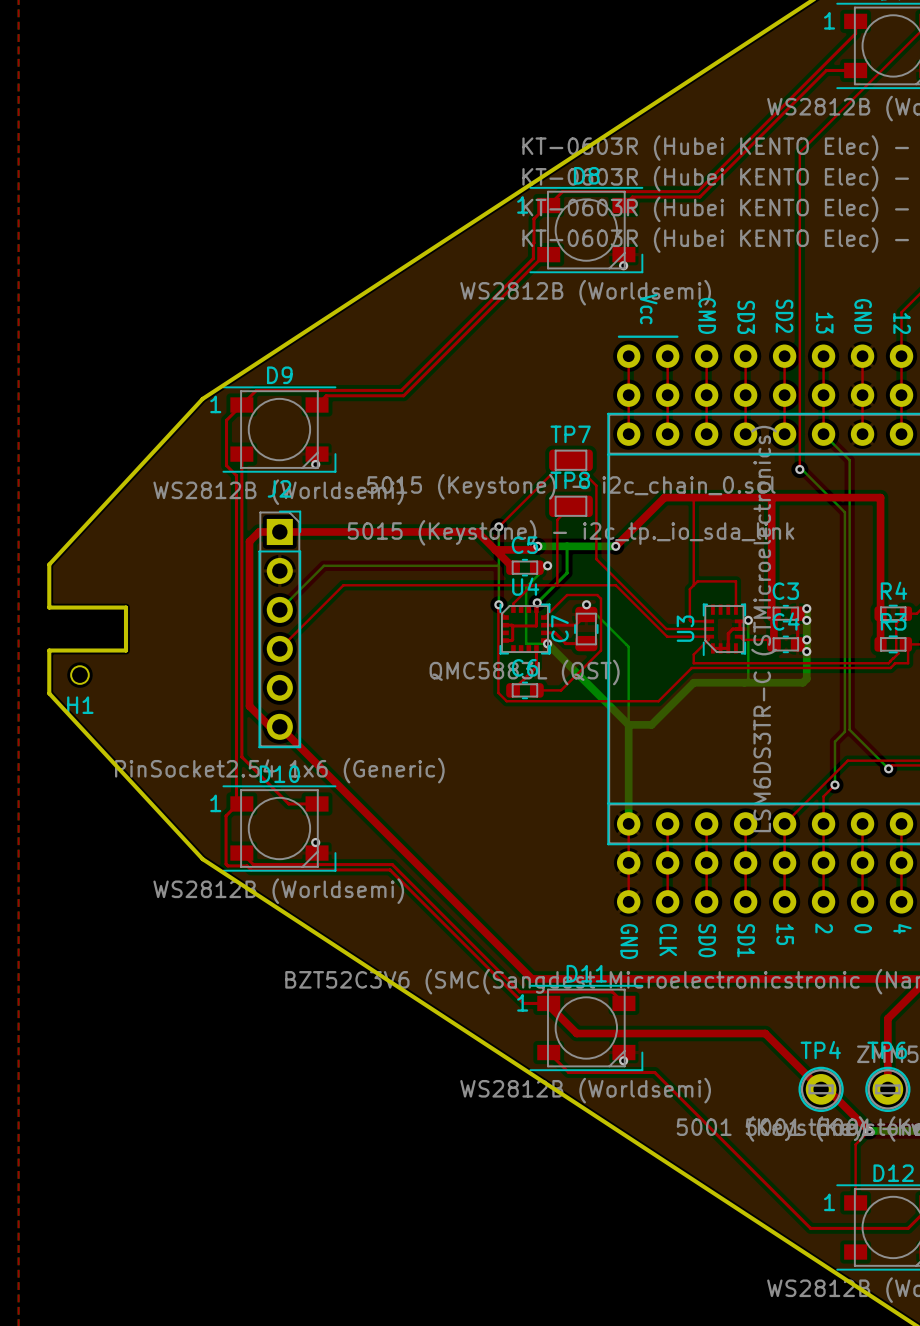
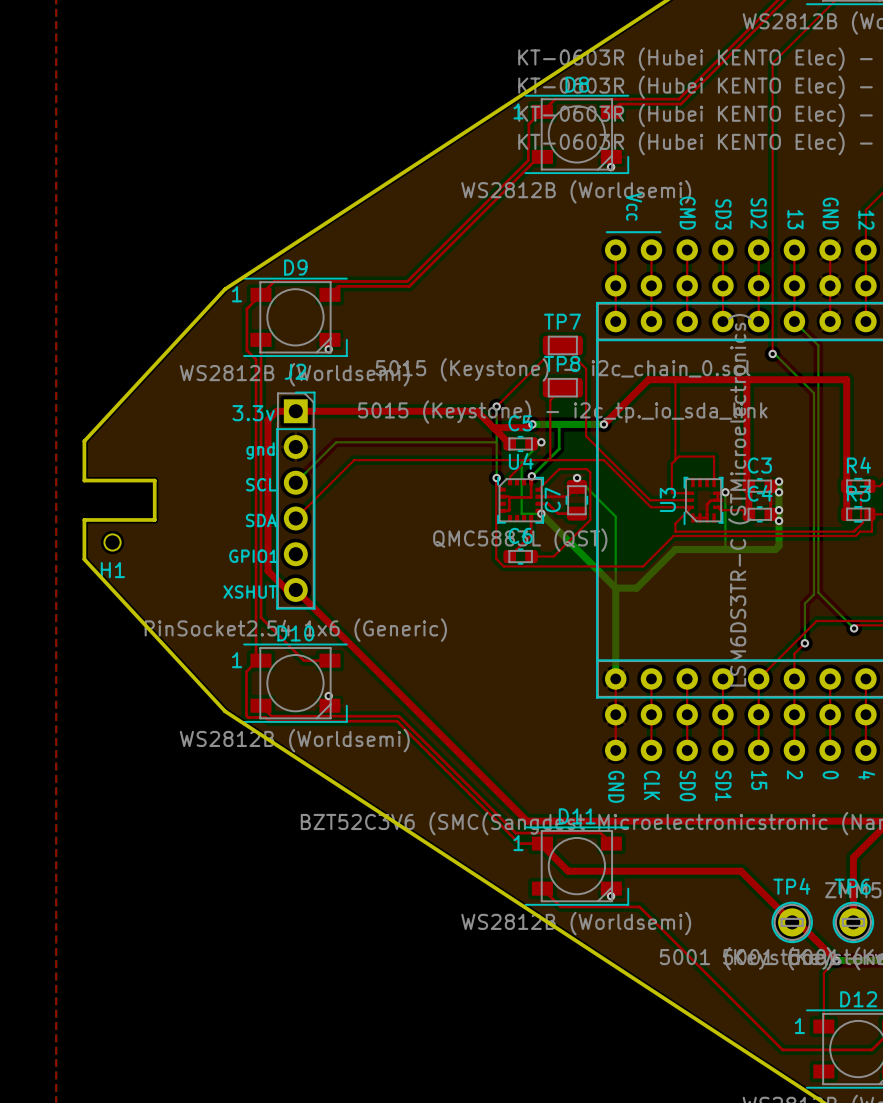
text: none -> 3.3v (253, 413)
text: none -> gnd (260, 450)
text: none -> SCL (261, 484)
text: none -> SDA (261, 520)
text: none -> GPIO1 (253, 556)
text: none -> XSHUT (250, 591)

